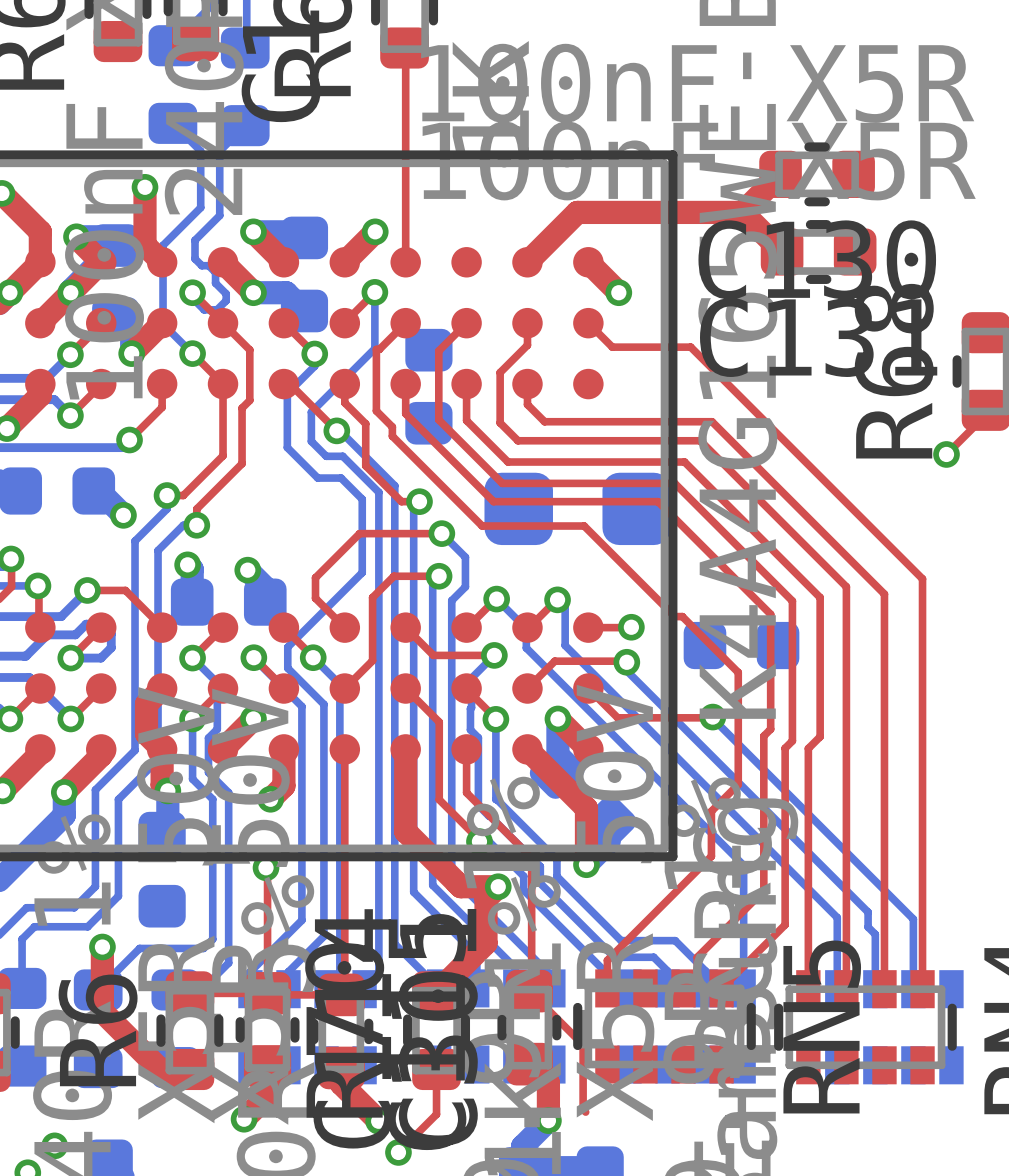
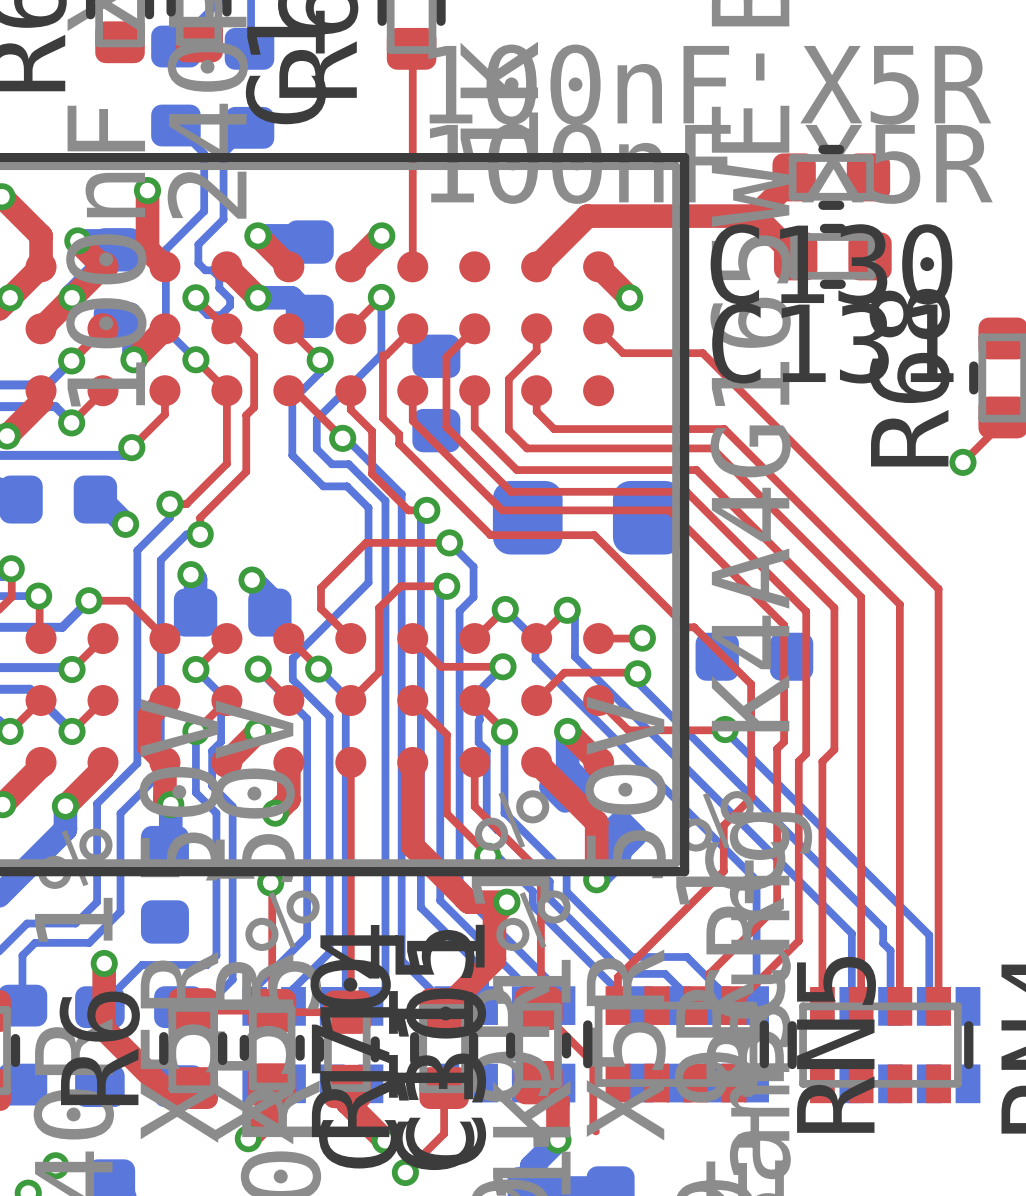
bottom track: (26, 656) (47, 634) (75, 634) (86, 624) (101, 624) (111, 634) (111, 647) (100, 658) (70, 658) -> (26, 667) (70, 667) (72, 669)

